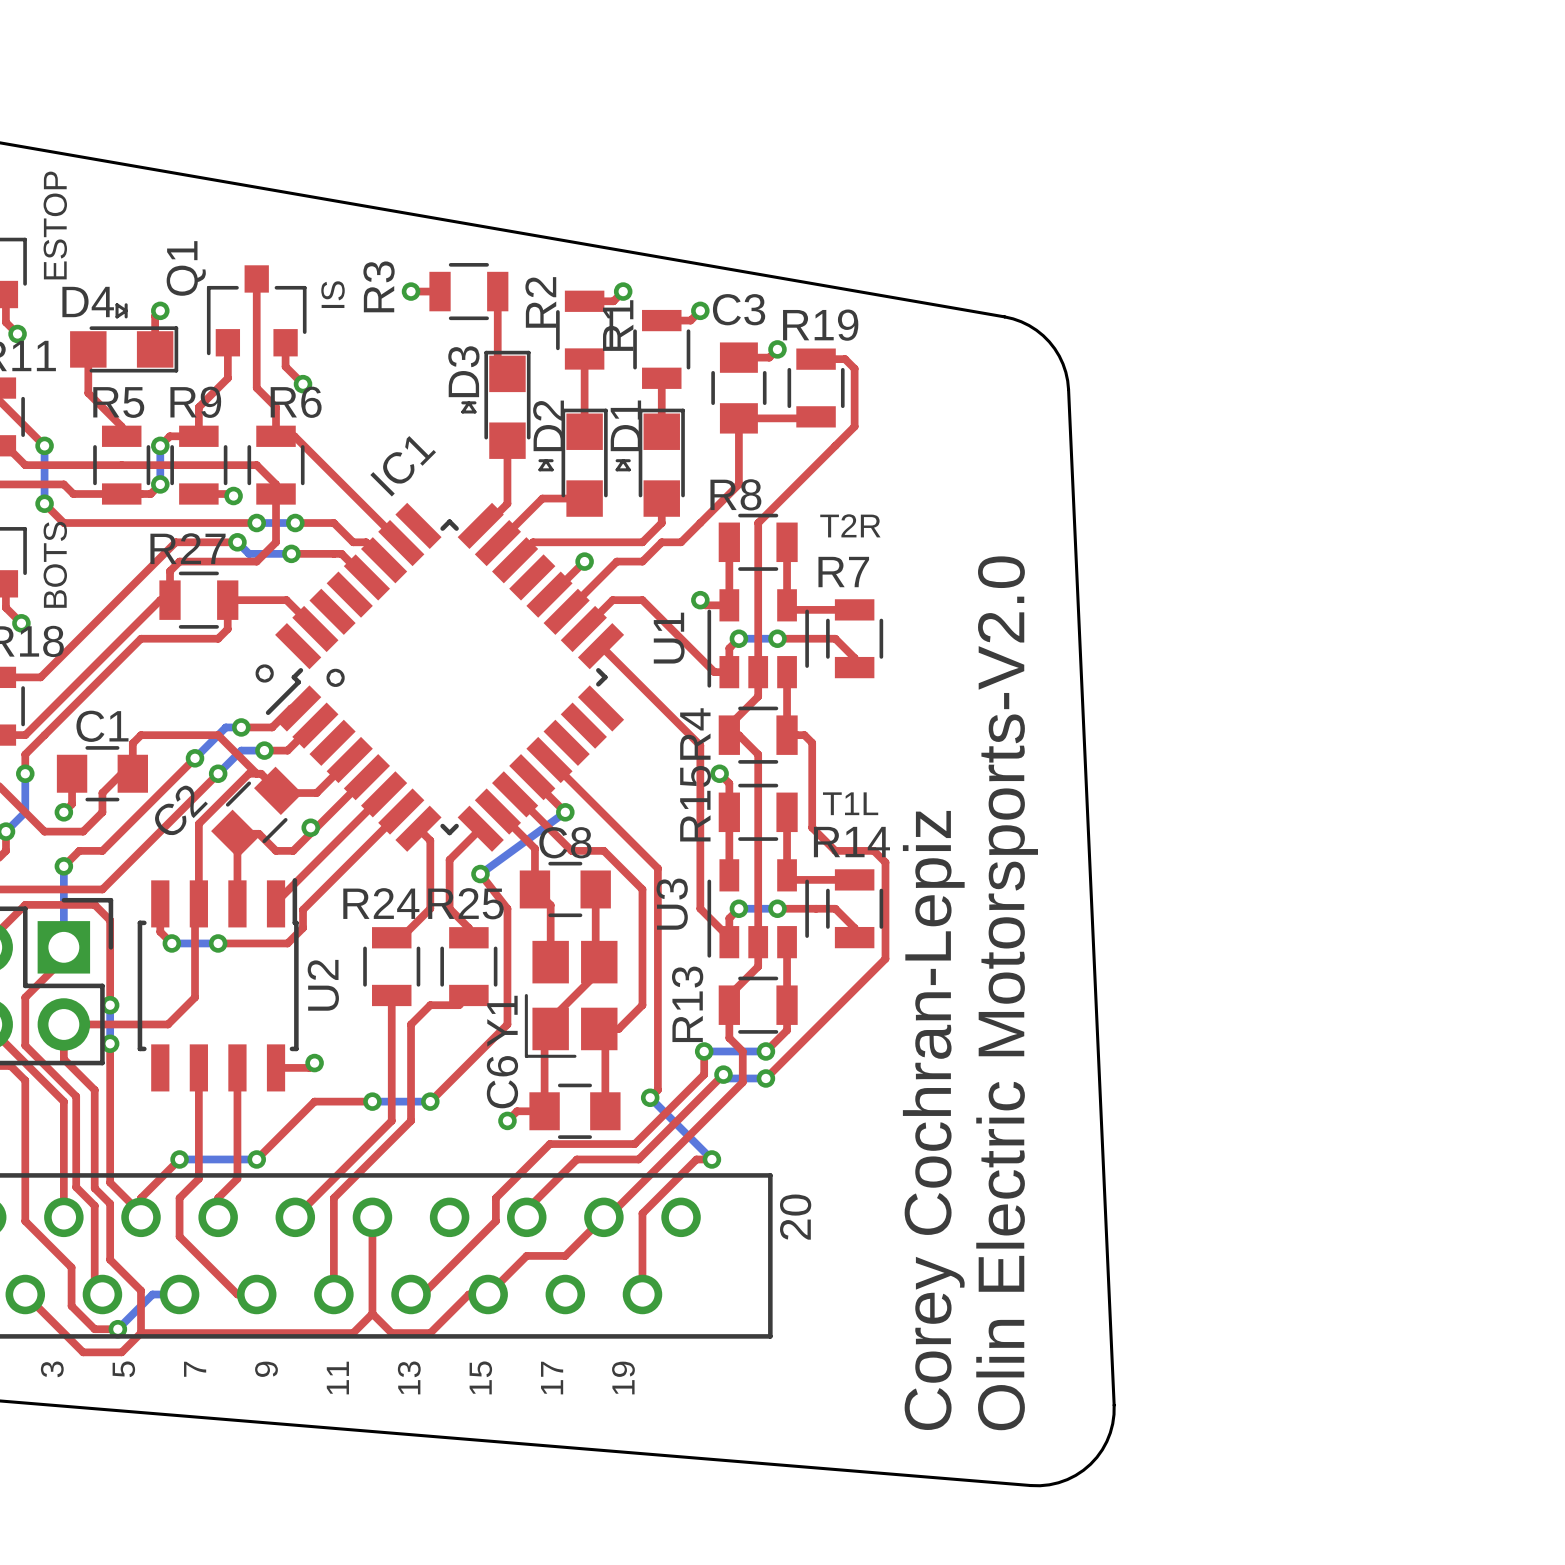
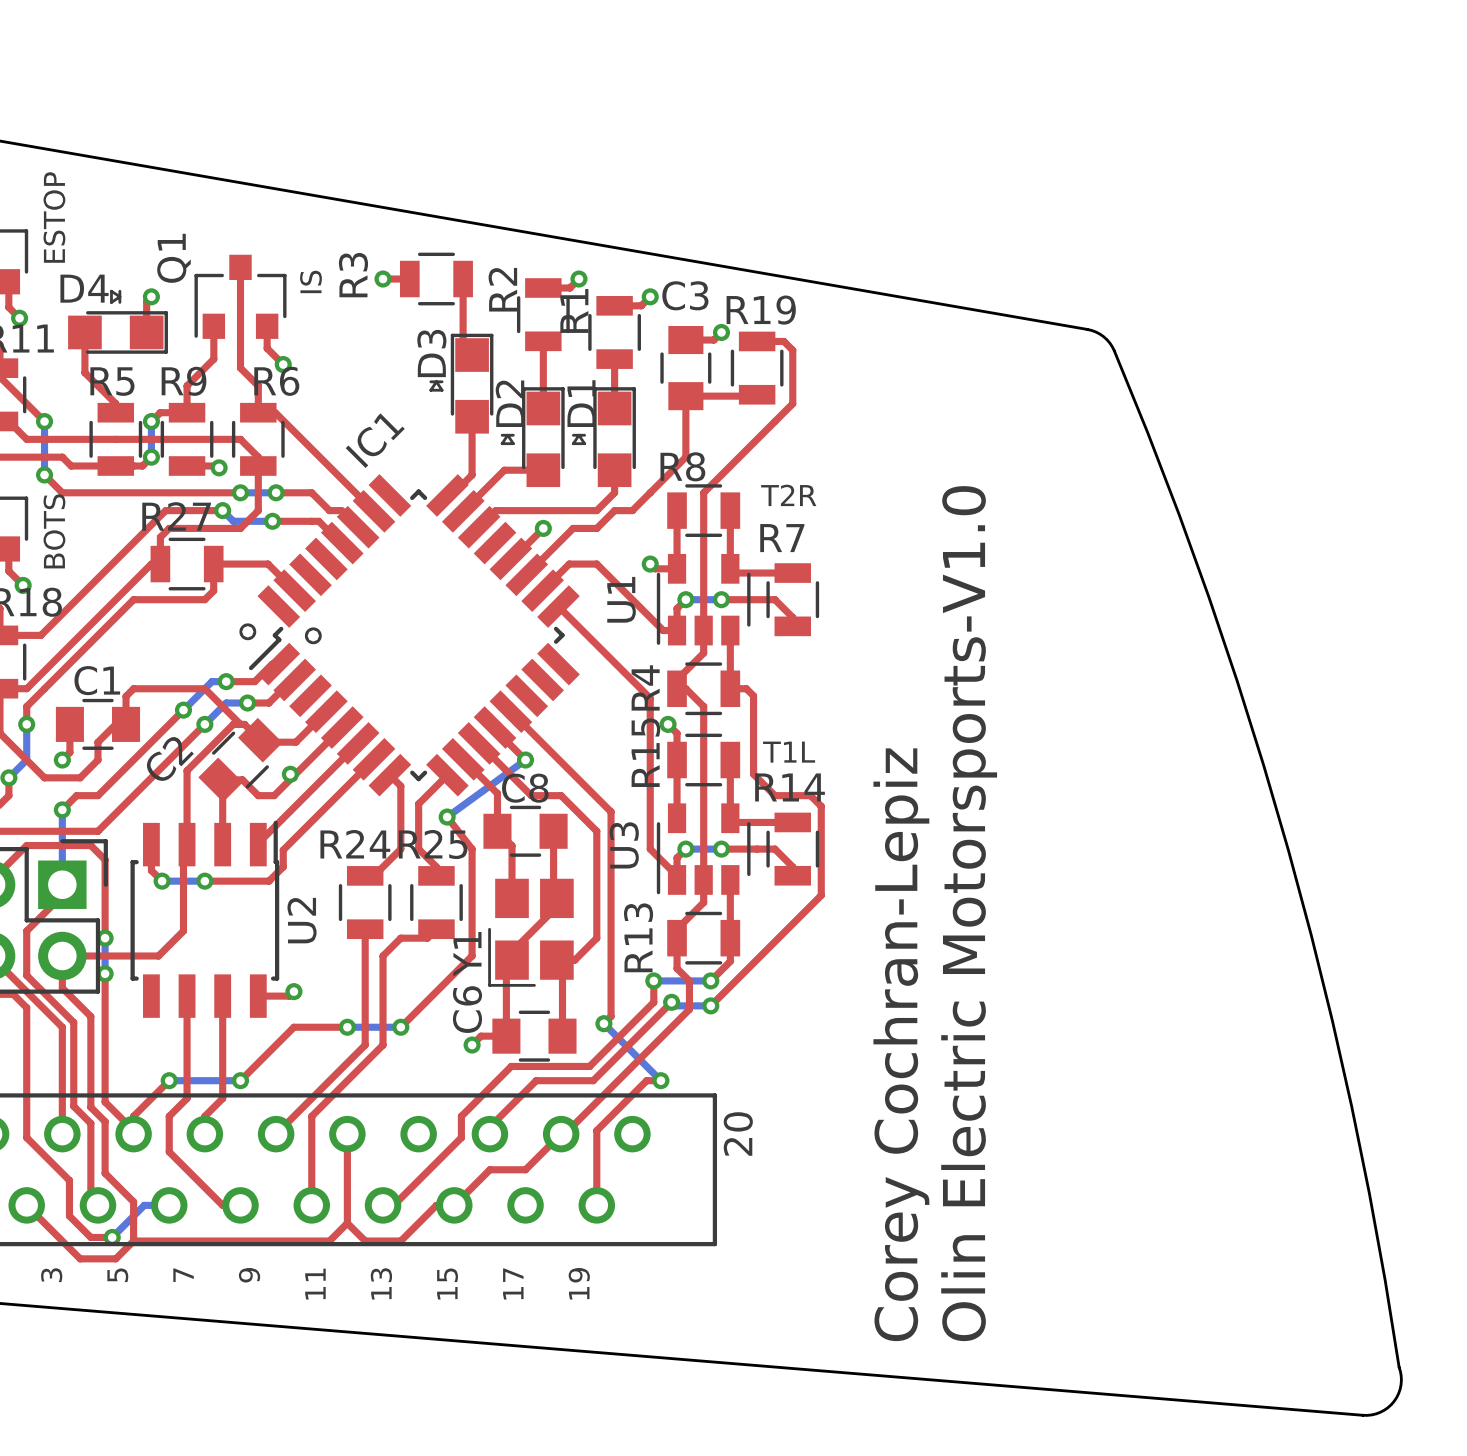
board edge: (1004, 316) (1029, 325) (1049, 341) (1063, 364) (1068, 389) (1114, 1405) (1112, 1423) (1106, 1441) (1090, 1464) (1067, 1479) (1049, 1484) (1030, 1485) -> (931, 302) (1091, 330) (1103, 336) (1114, 350) (1147, 432) (1209, 597) (1237, 681) (1288, 850) (1332, 1020) (1351, 1106) (1385, 1280) (1401, 1380) (1398, 1393) (1391, 1404) (1380, 1412) (1367, 1415) (955, 1381)
text: Olin Electric Motorsports-V2.0 (1007, 993) -> Olin Electric Motorsports-V1.0 (969, 913)
text position: Corey Cochran-Lepiz (933, 1120) -> Corey Cochran-Lepiz (901, 1044)

